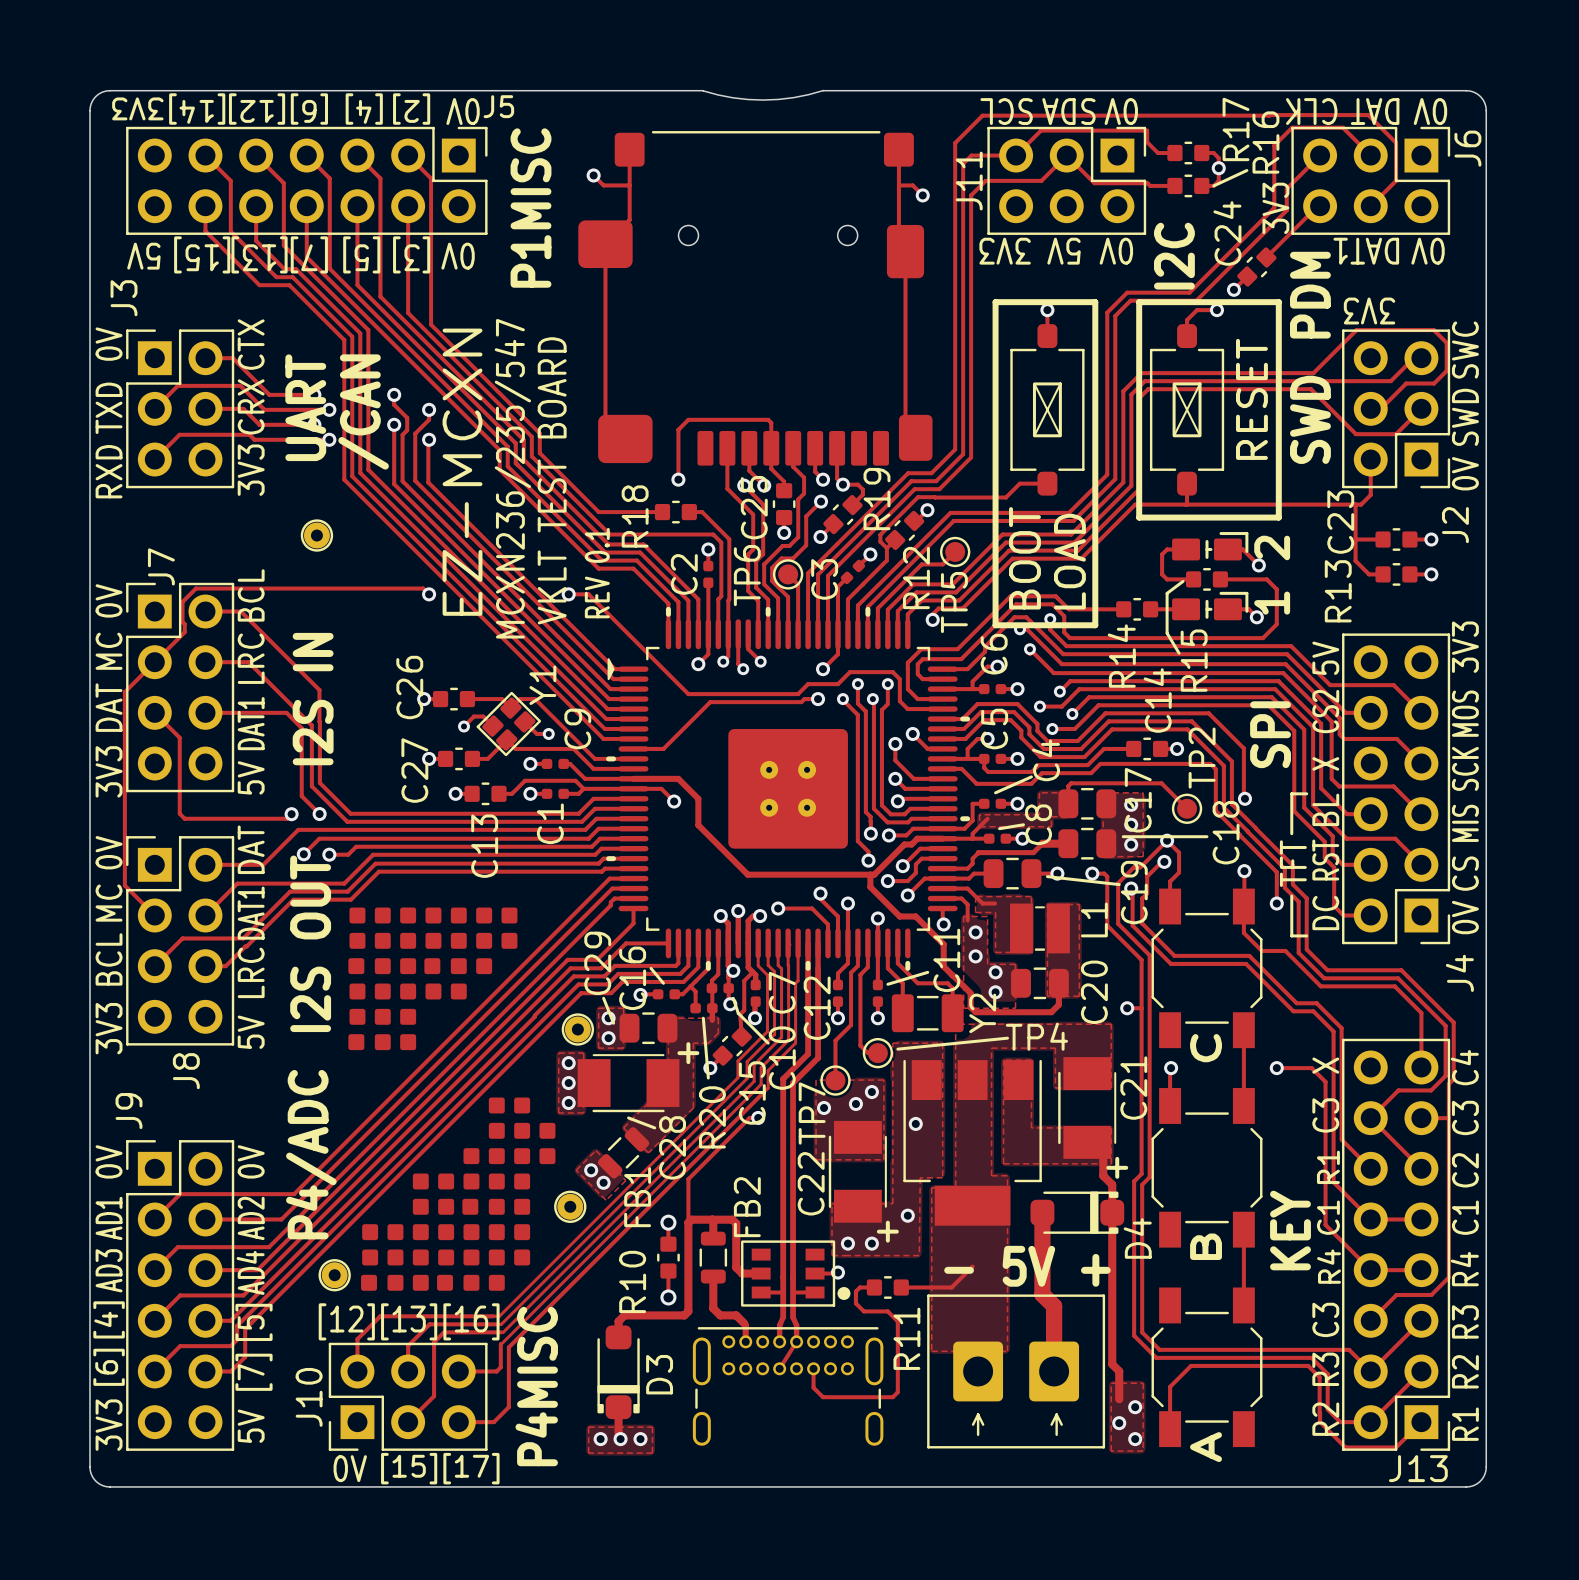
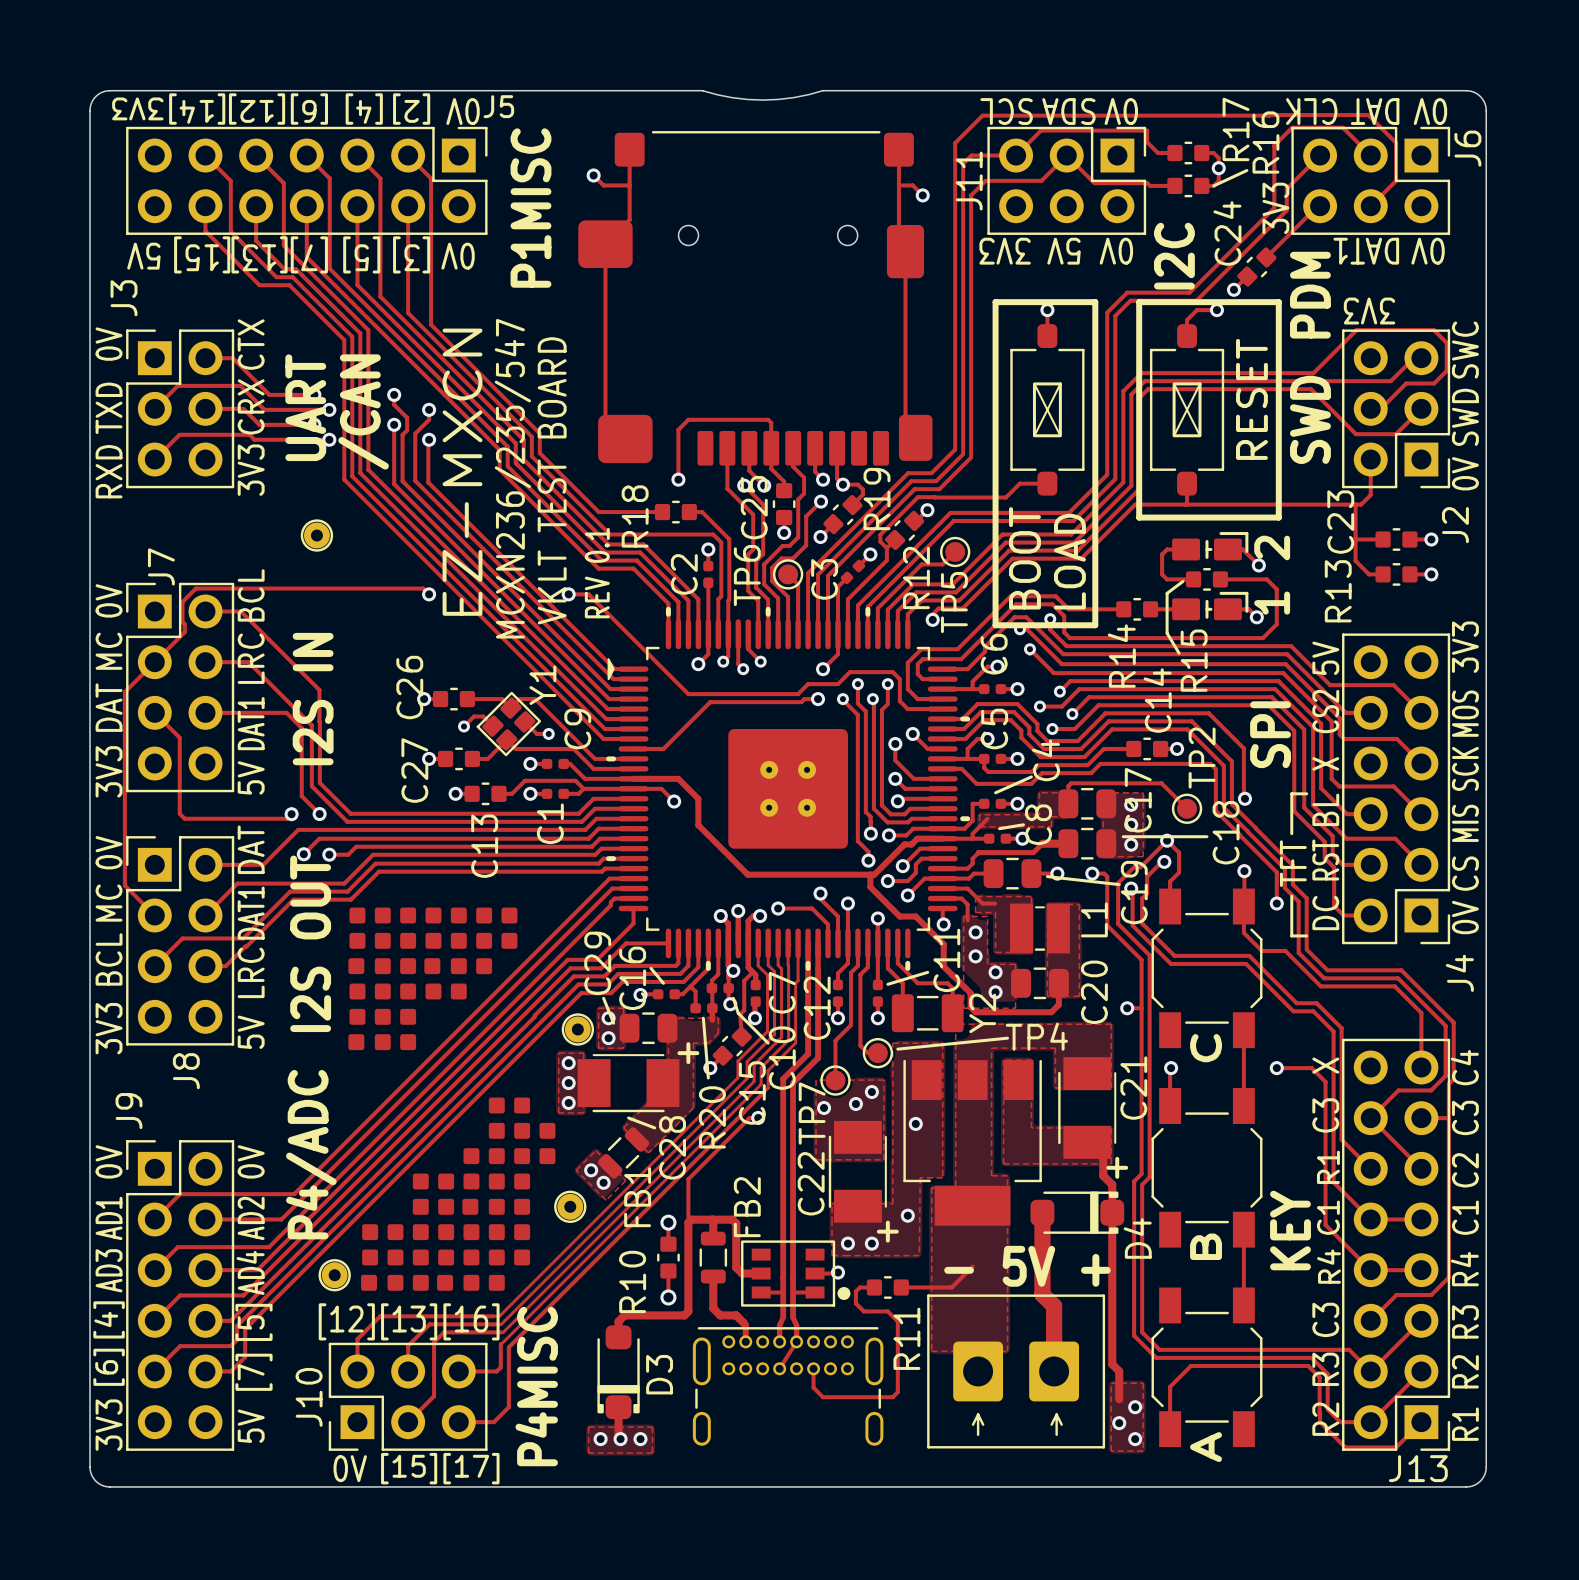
text: EZ-MCXN (462, 472) -> EZ-MXCN (462, 472)

